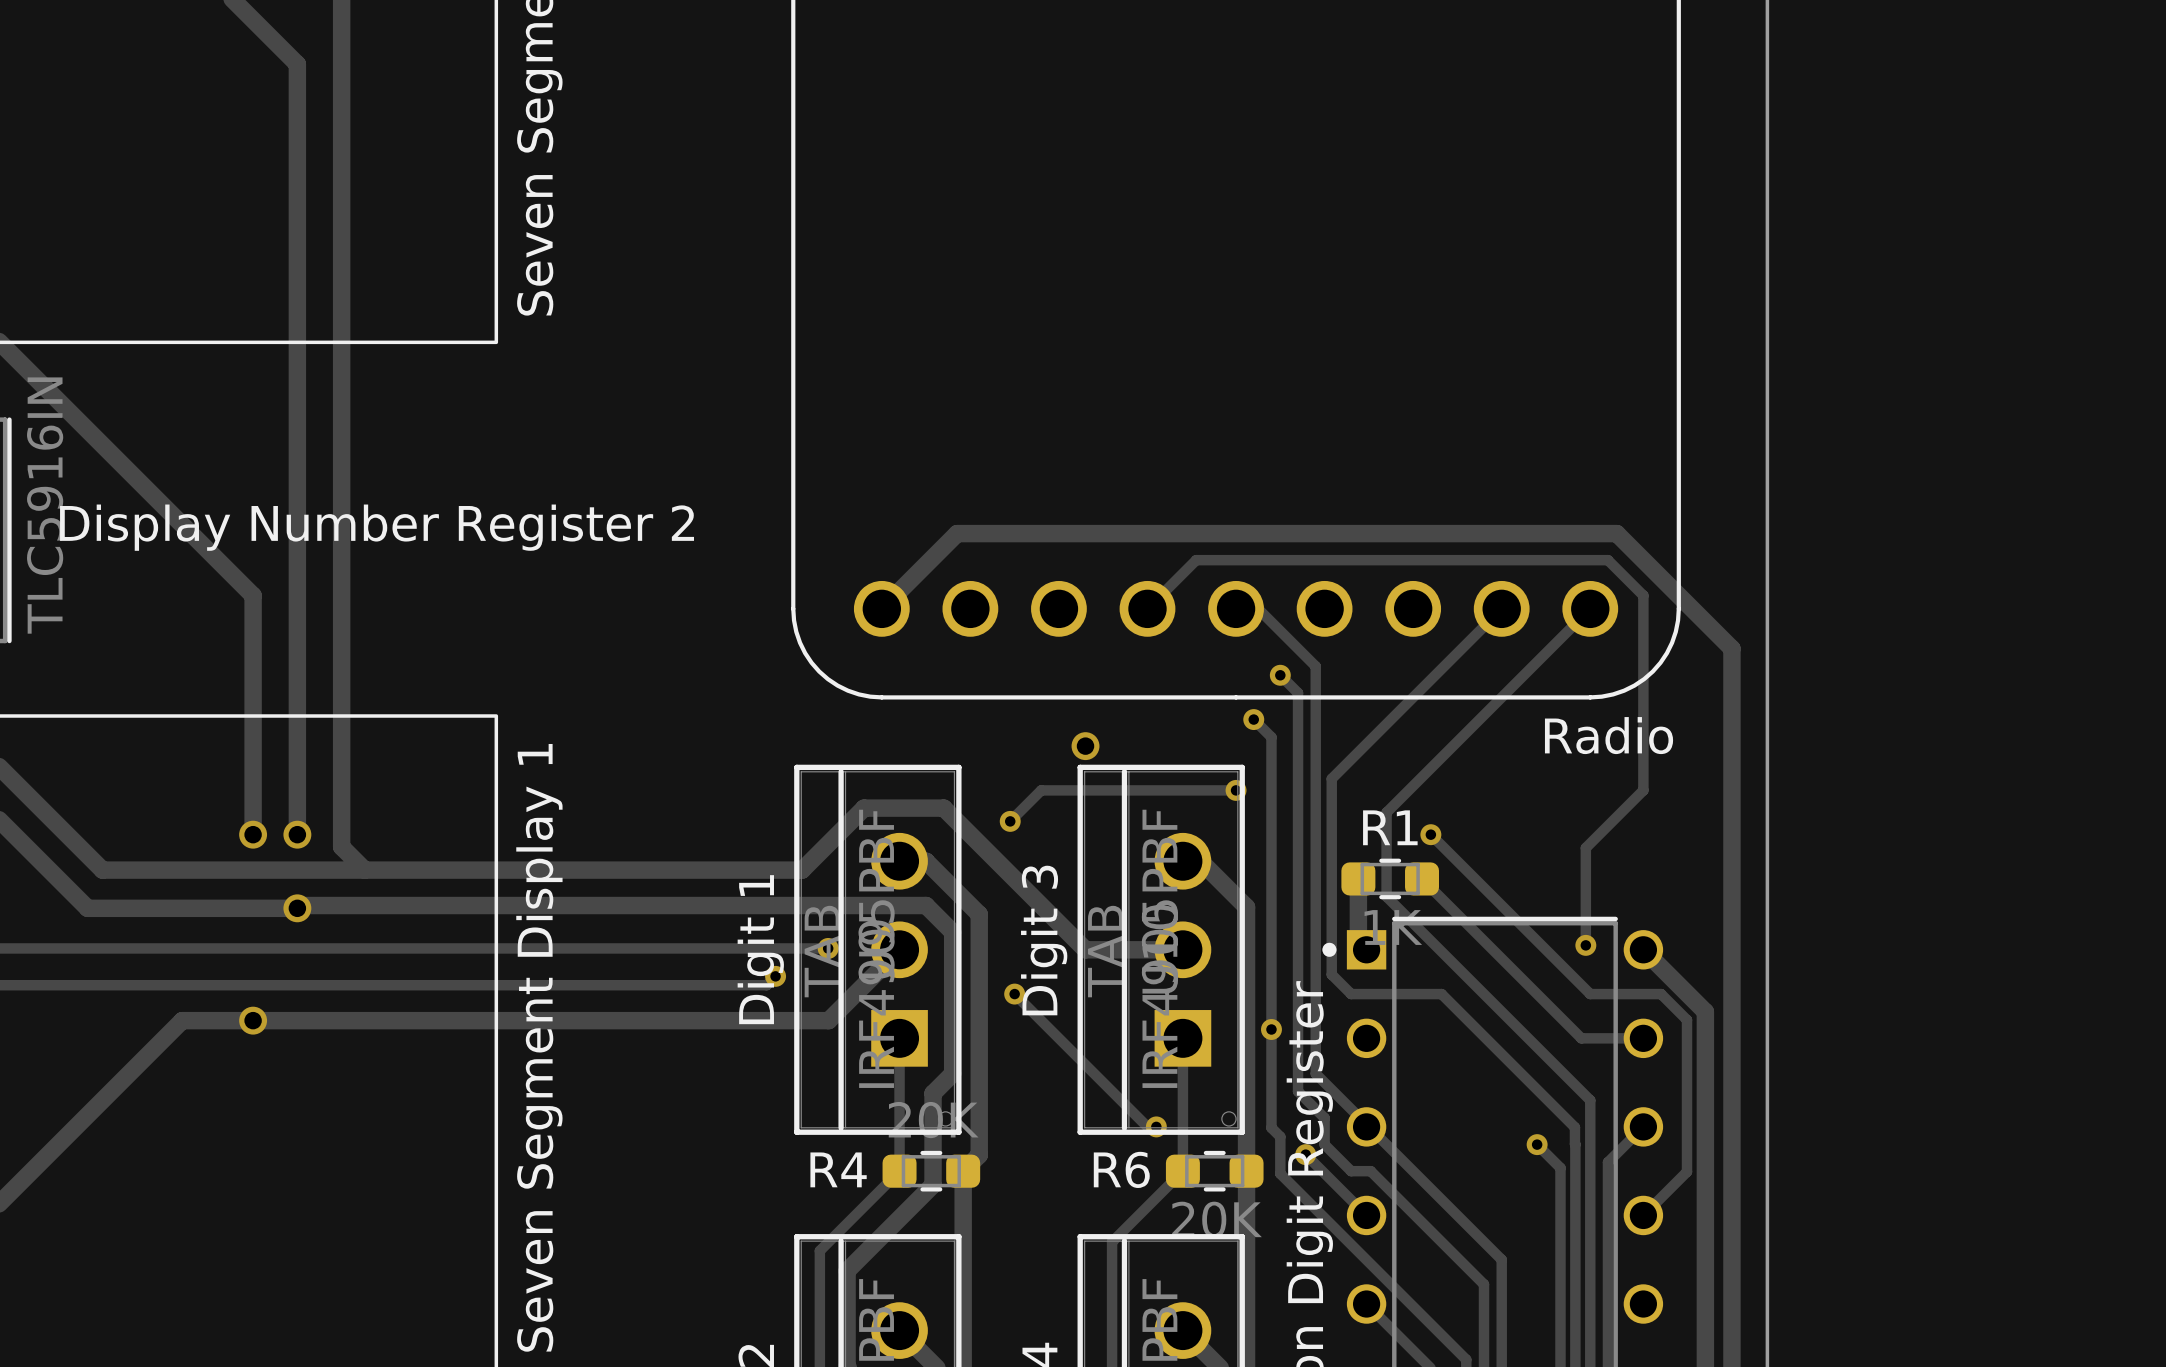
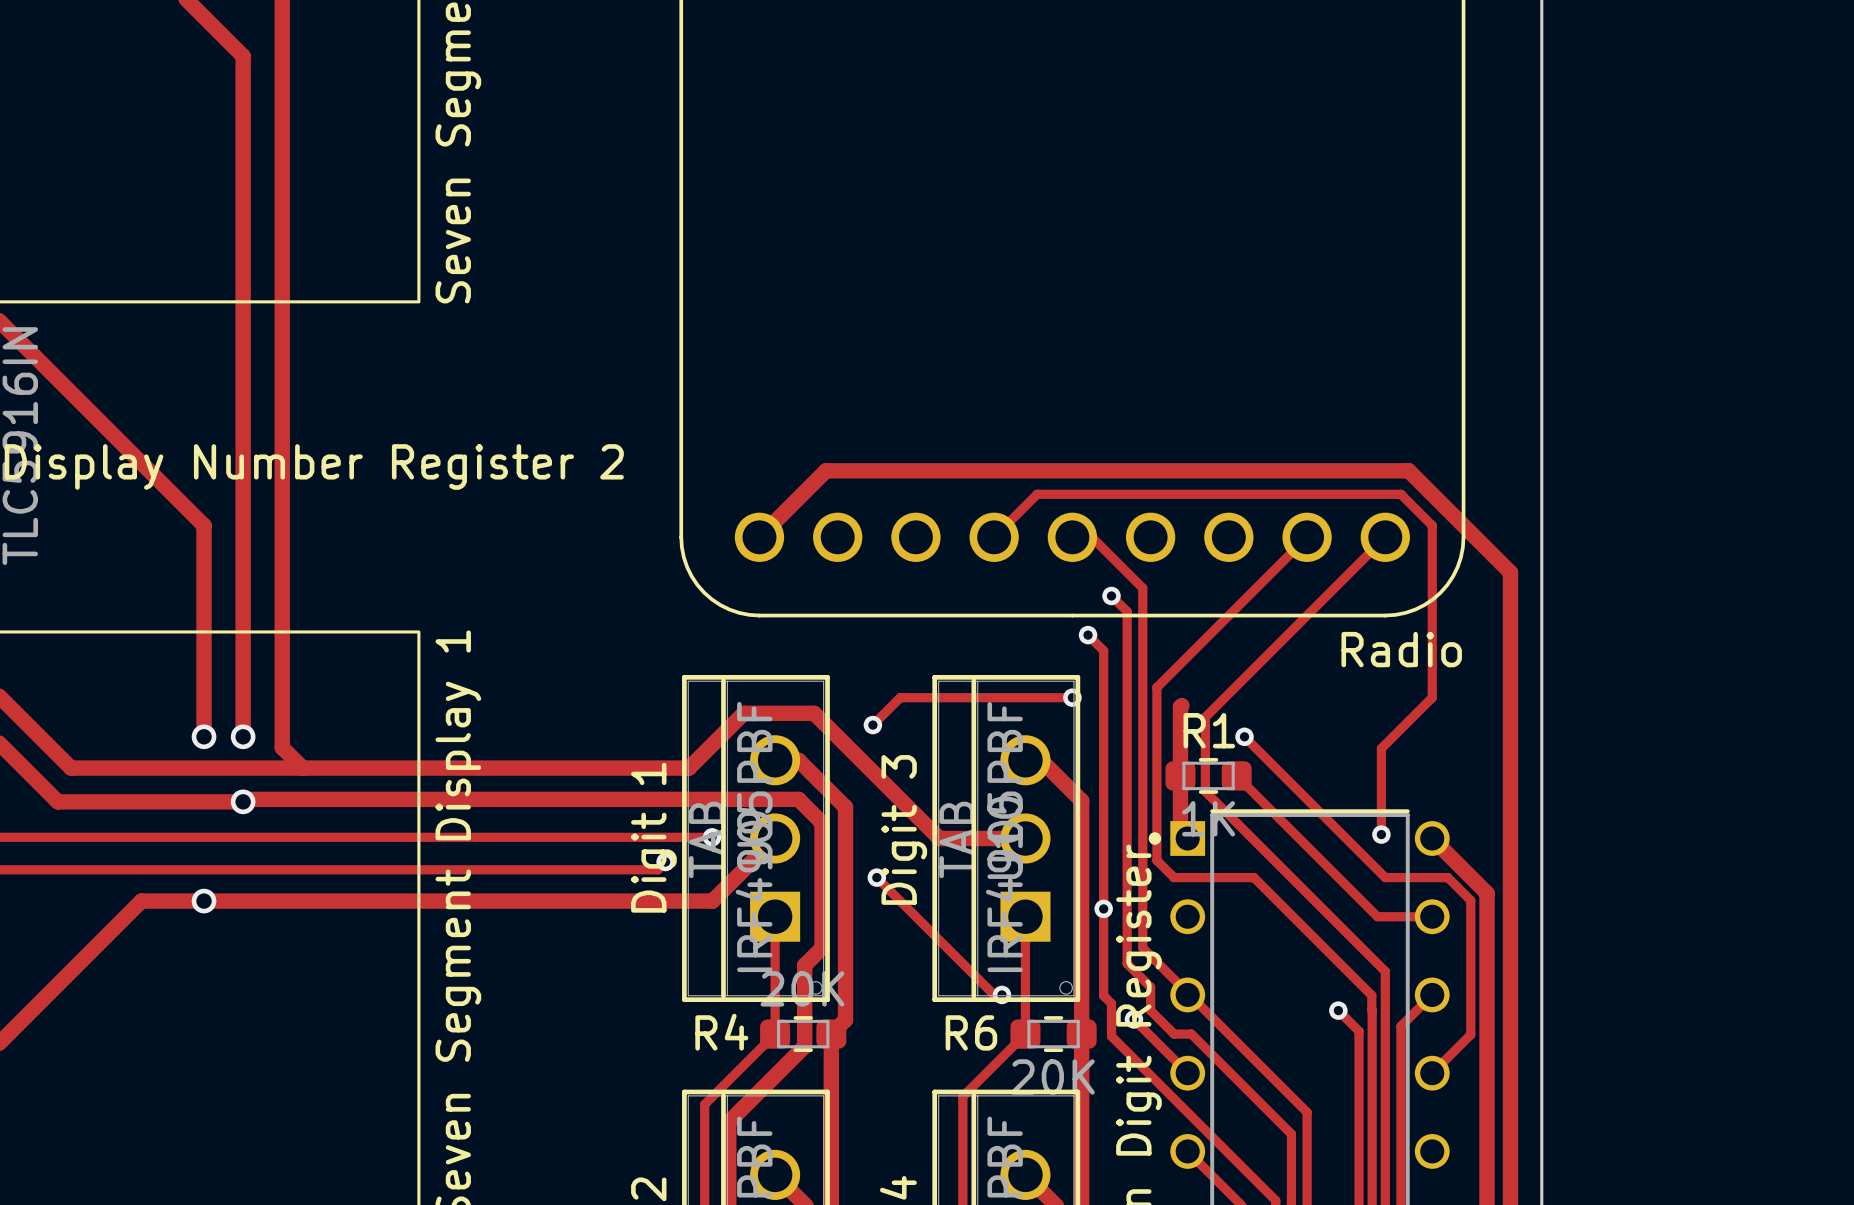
via: (1085, 746) -> none
track: none -> (1181, 705) (1180, 775)

